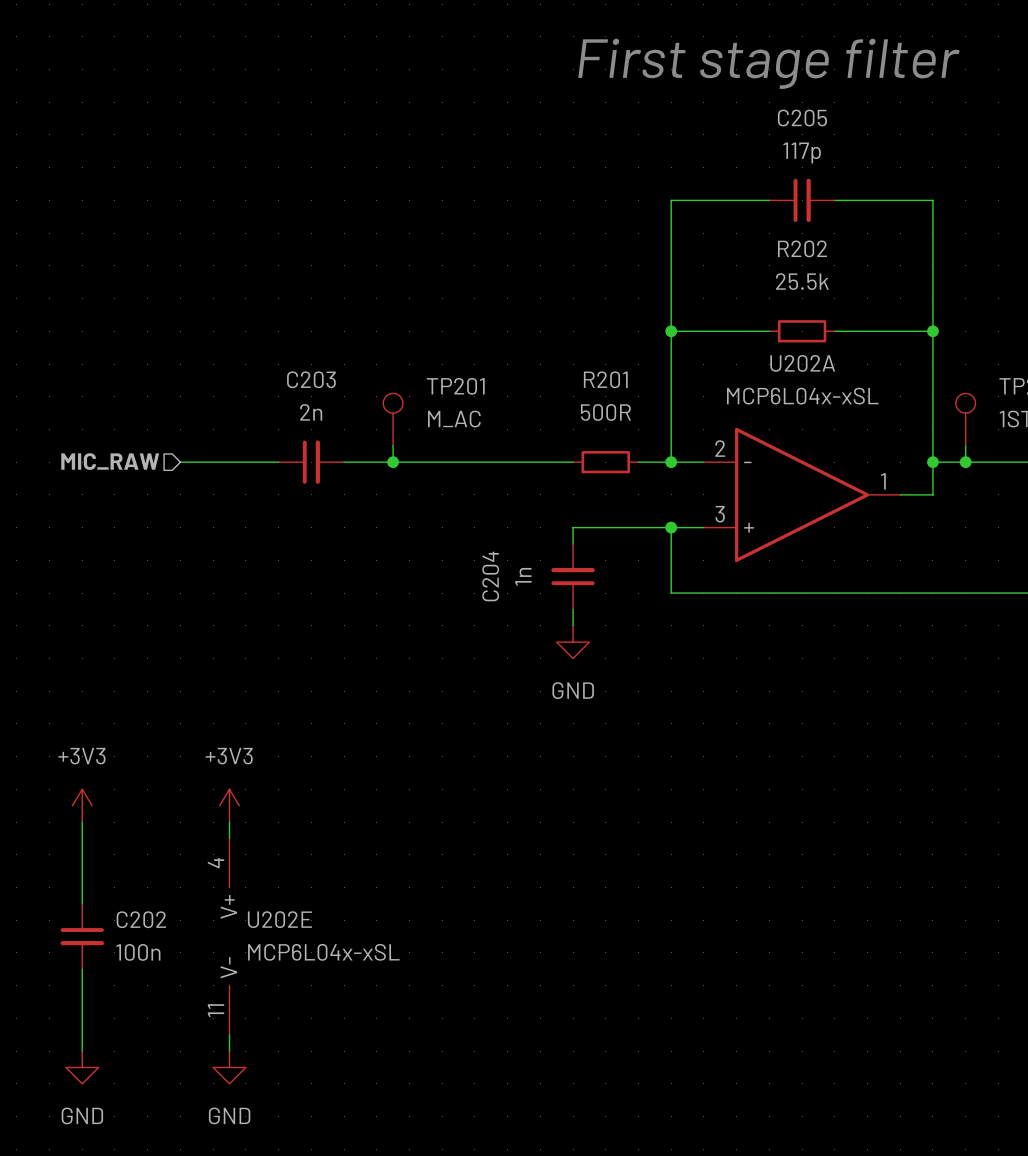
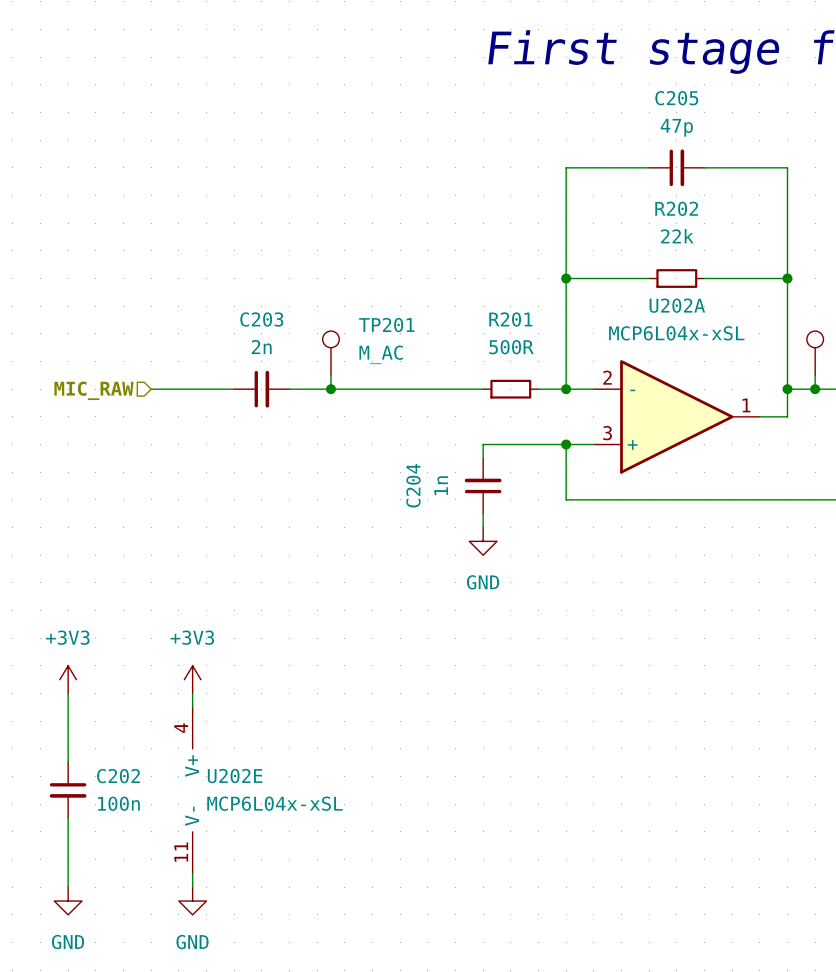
C205 value: 117p (802, 152) -> 47p (676, 127)
R202 value: 25.5k (802, 281) -> 22k (677, 236)

